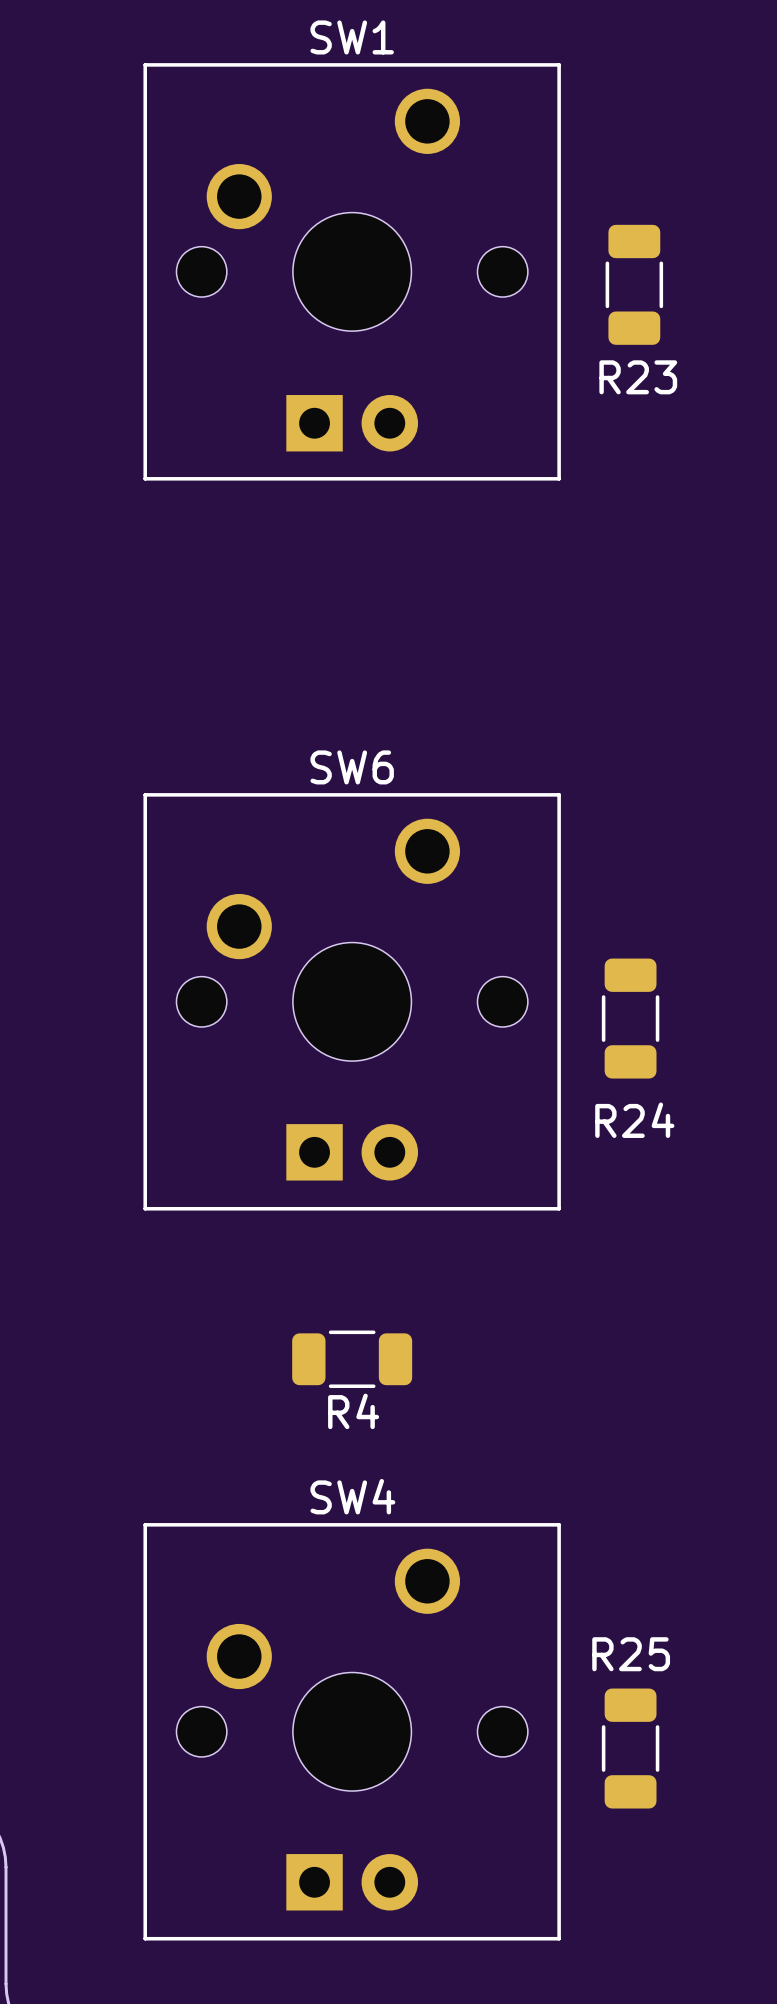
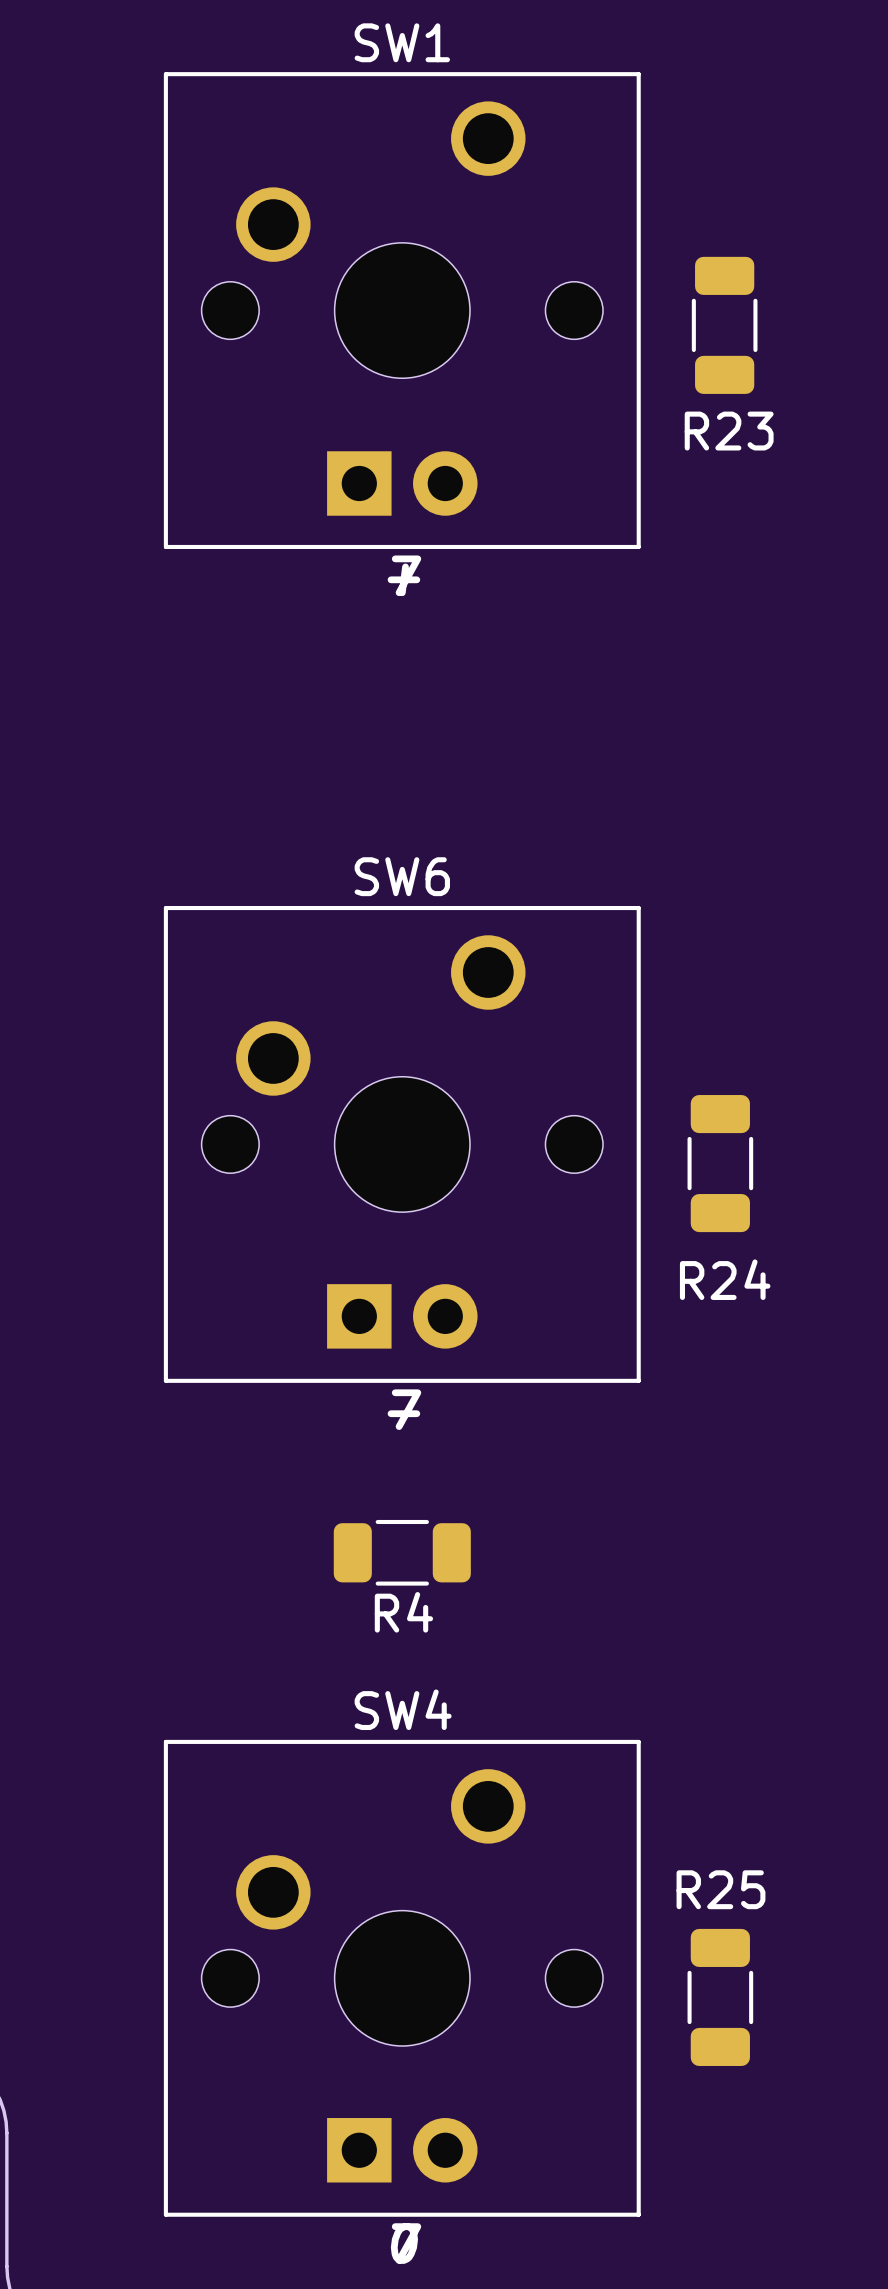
SW1 footprint: [143, 63, 561, 481] -> [163, 72, 641, 550]
SW6 footprint: [143, 793, 561, 1211] -> [163, 906, 641, 1383]
SW4 footprint: [143, 1523, 561, 1941] -> [163, 1739, 641, 2217]

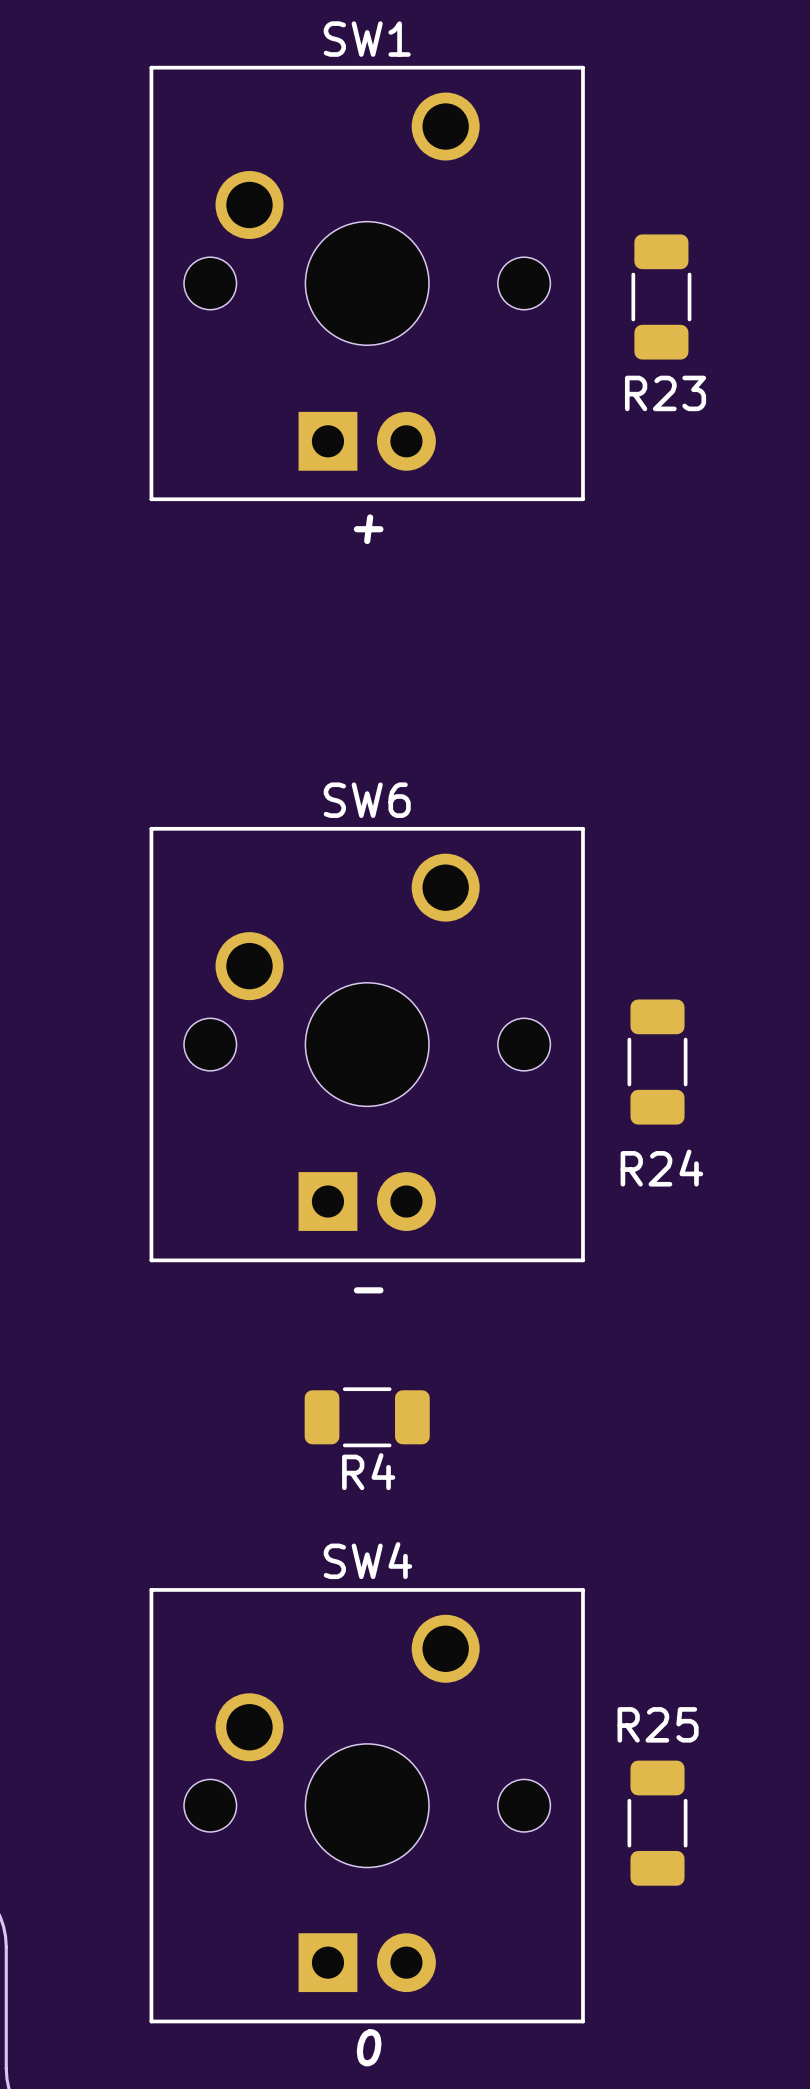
SW1 footprint: [163, 72, 641, 550] -> [149, 65, 585, 502]
SW6 footprint: [163, 906, 641, 1383] -> [149, 826, 585, 1263]
SW4 footprint: [163, 1739, 641, 2217] -> [149, 1588, 585, 2024]

